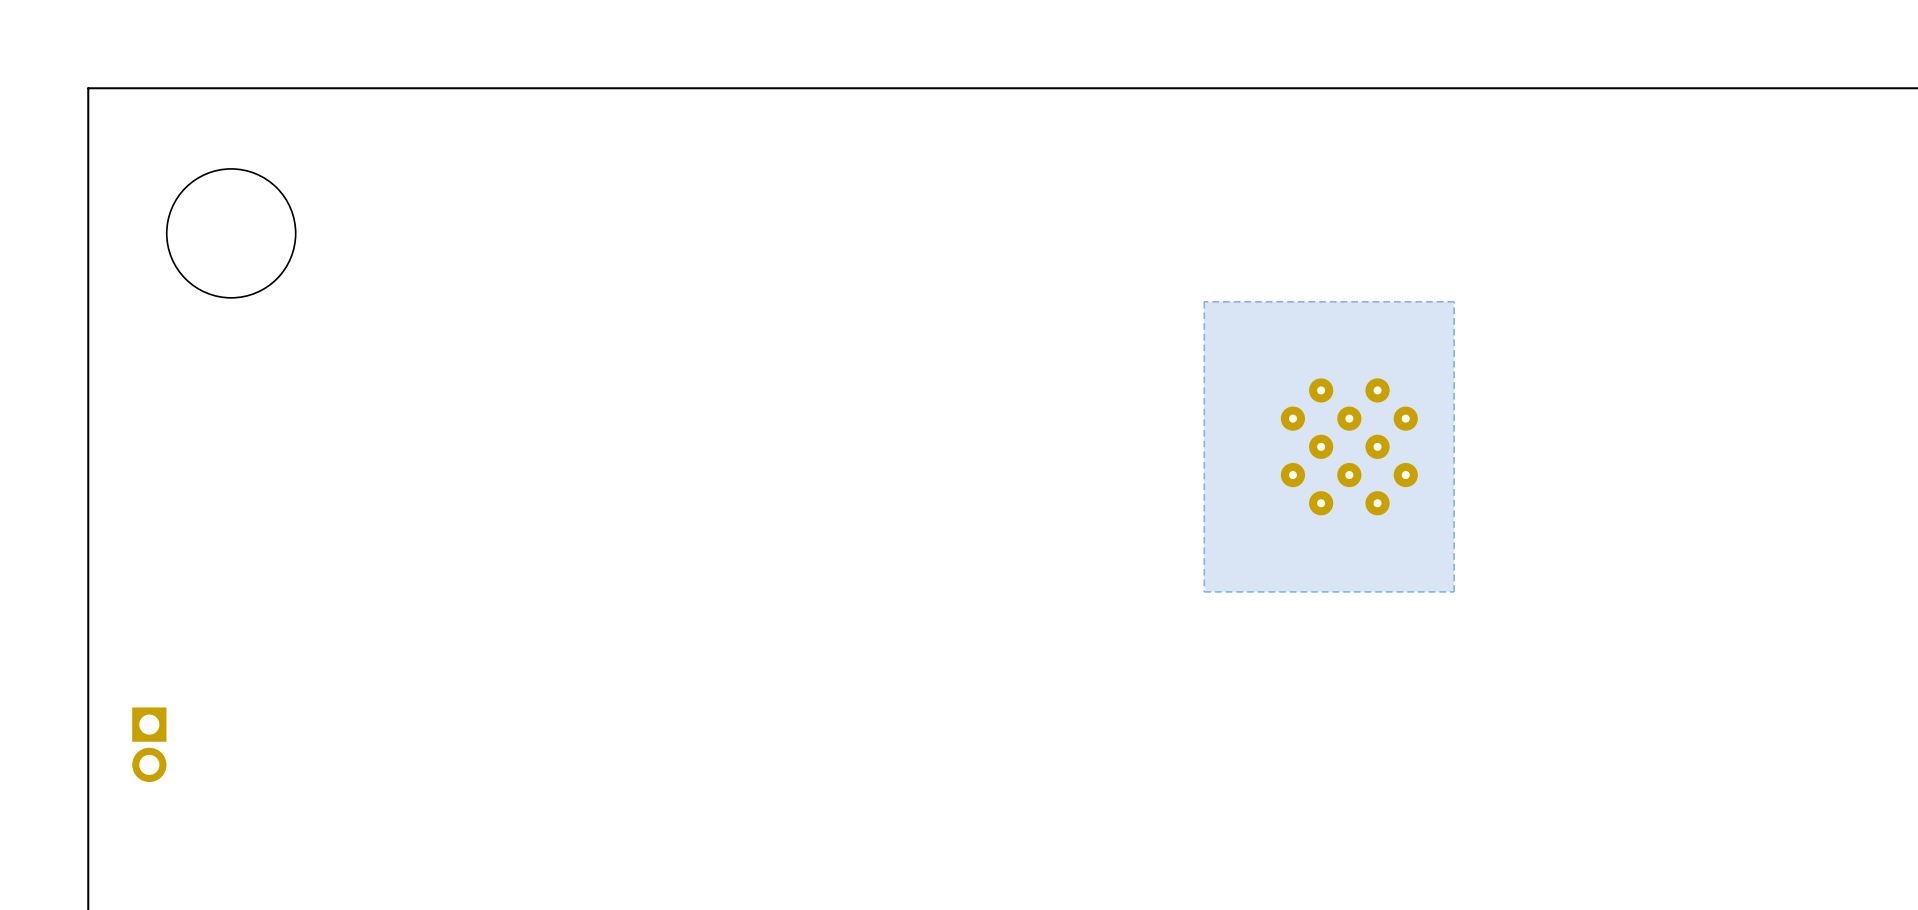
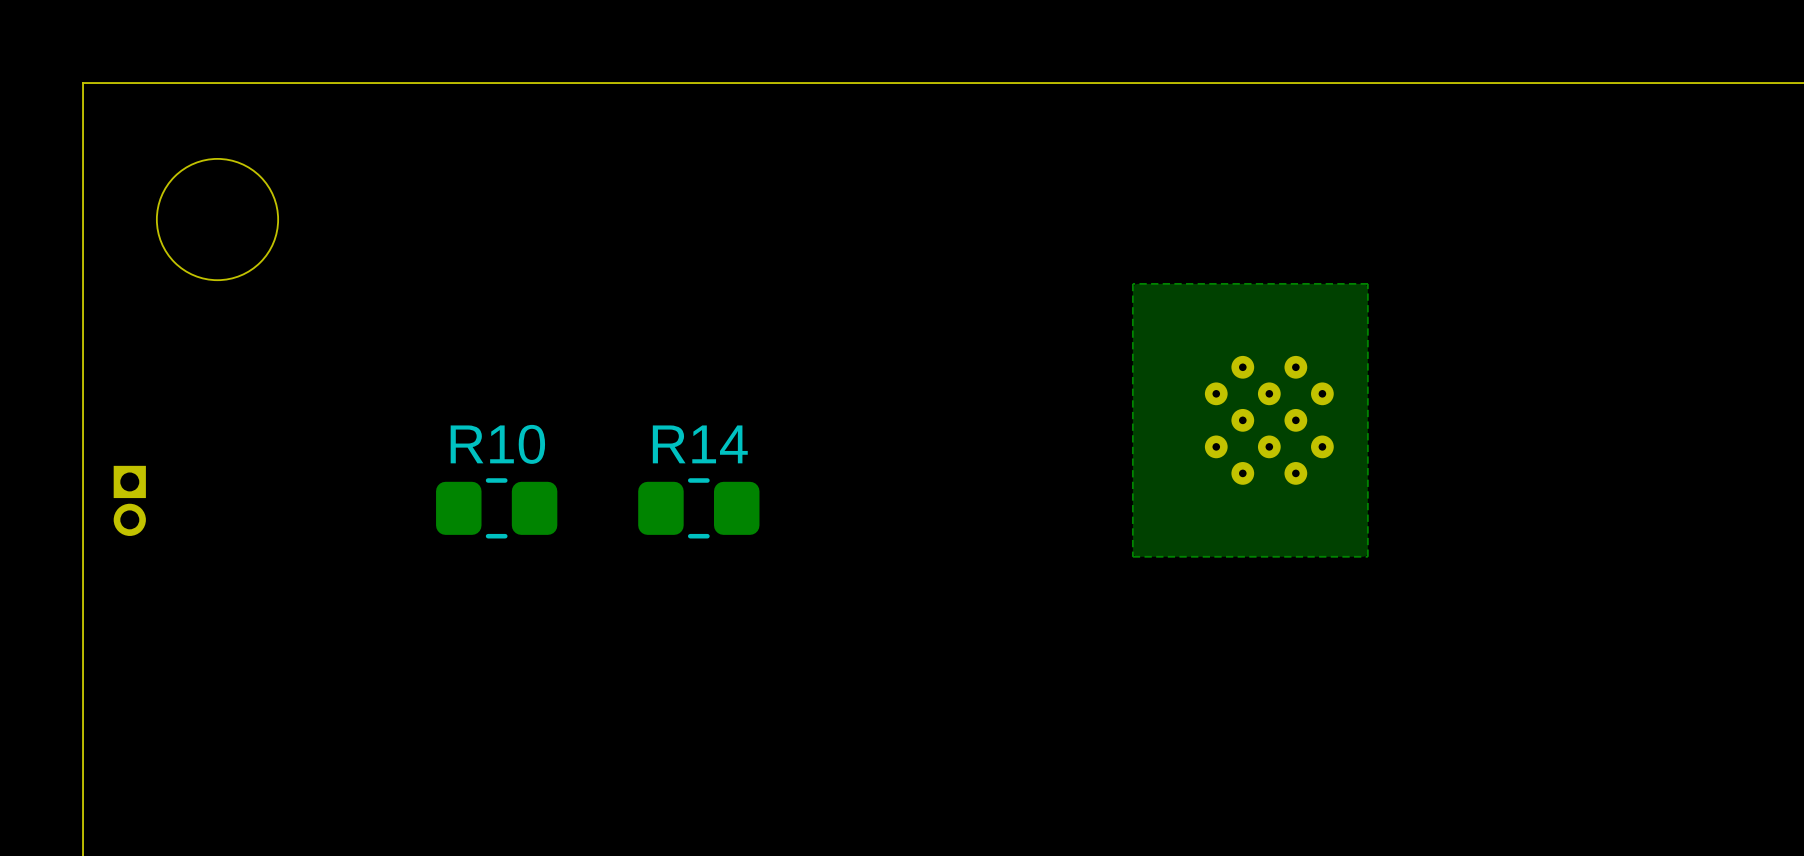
R10: none -> (496, 508)
R14: none -> (698, 508)
part position: (149, 744) -> (129, 500)

